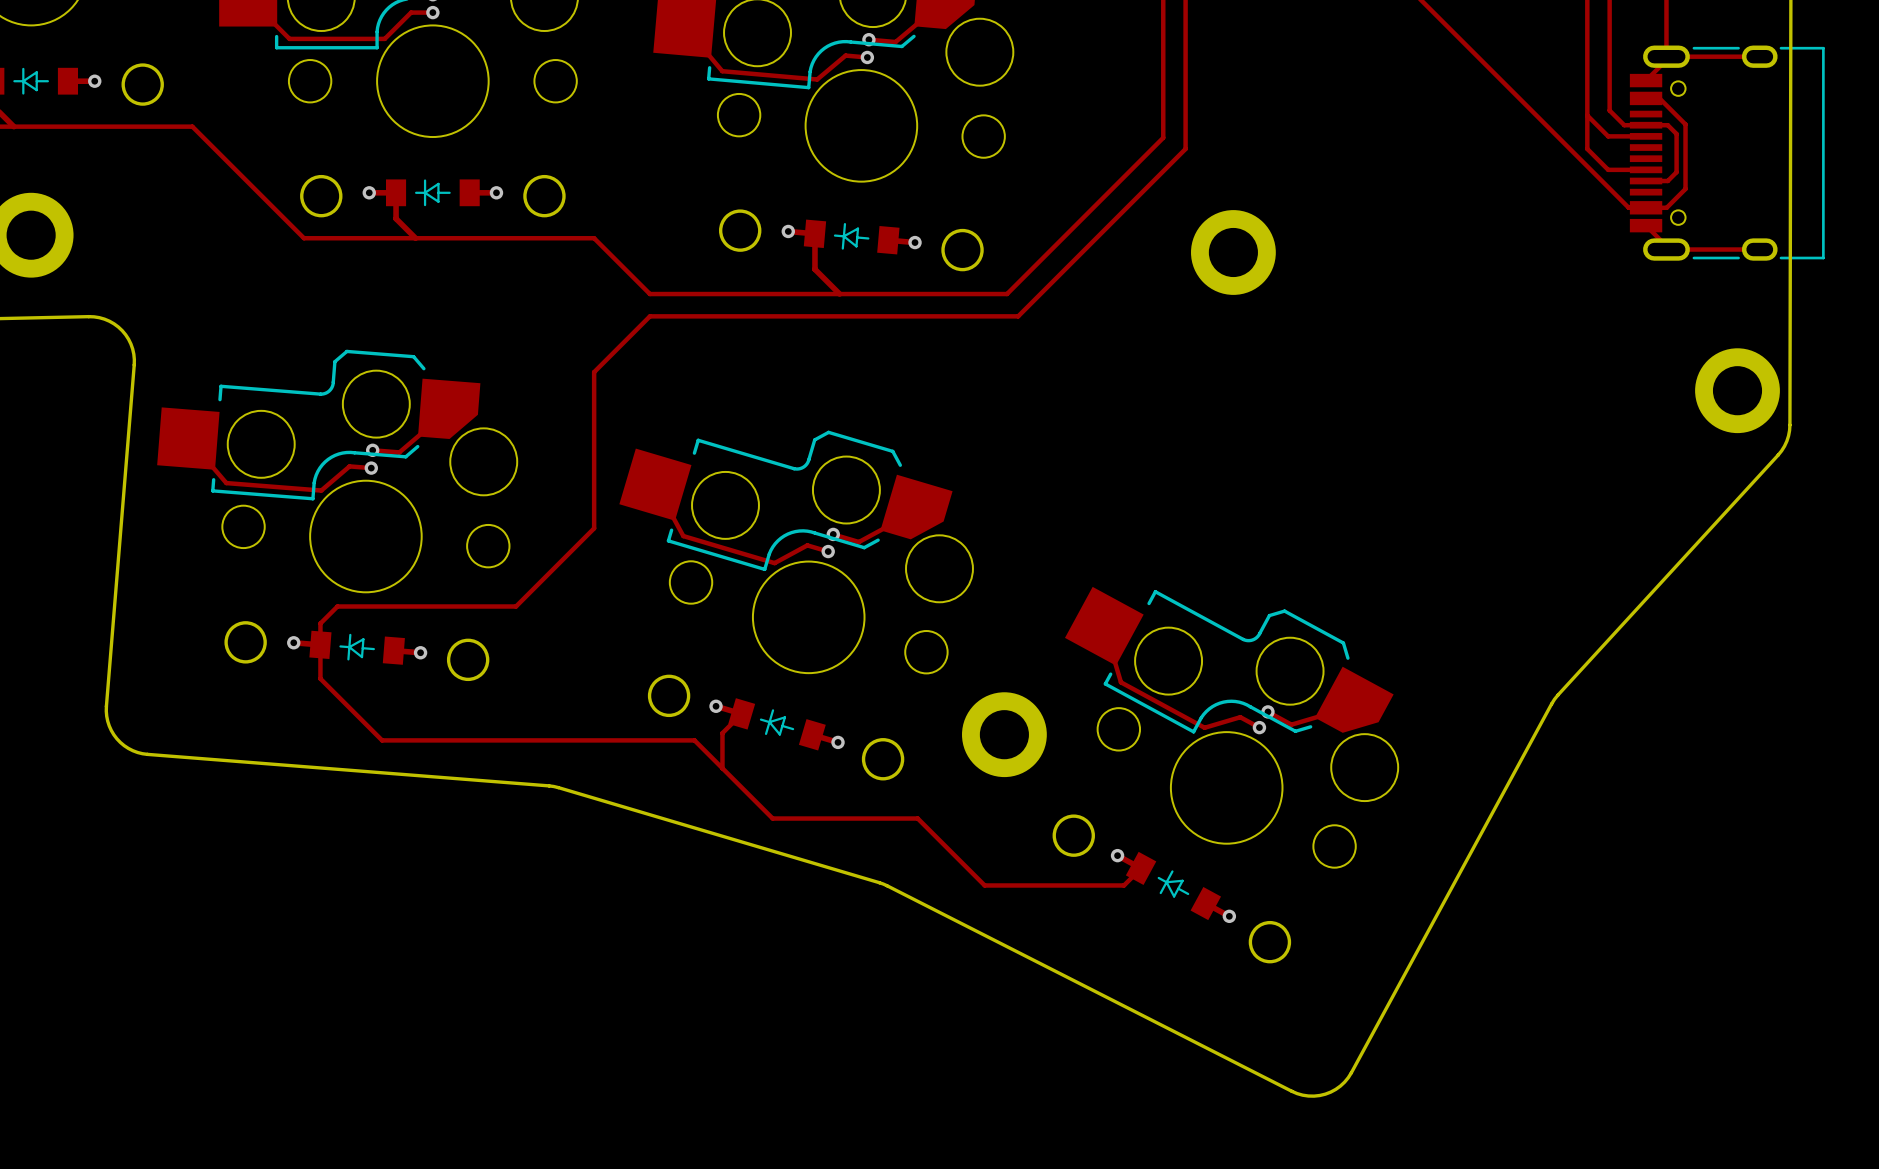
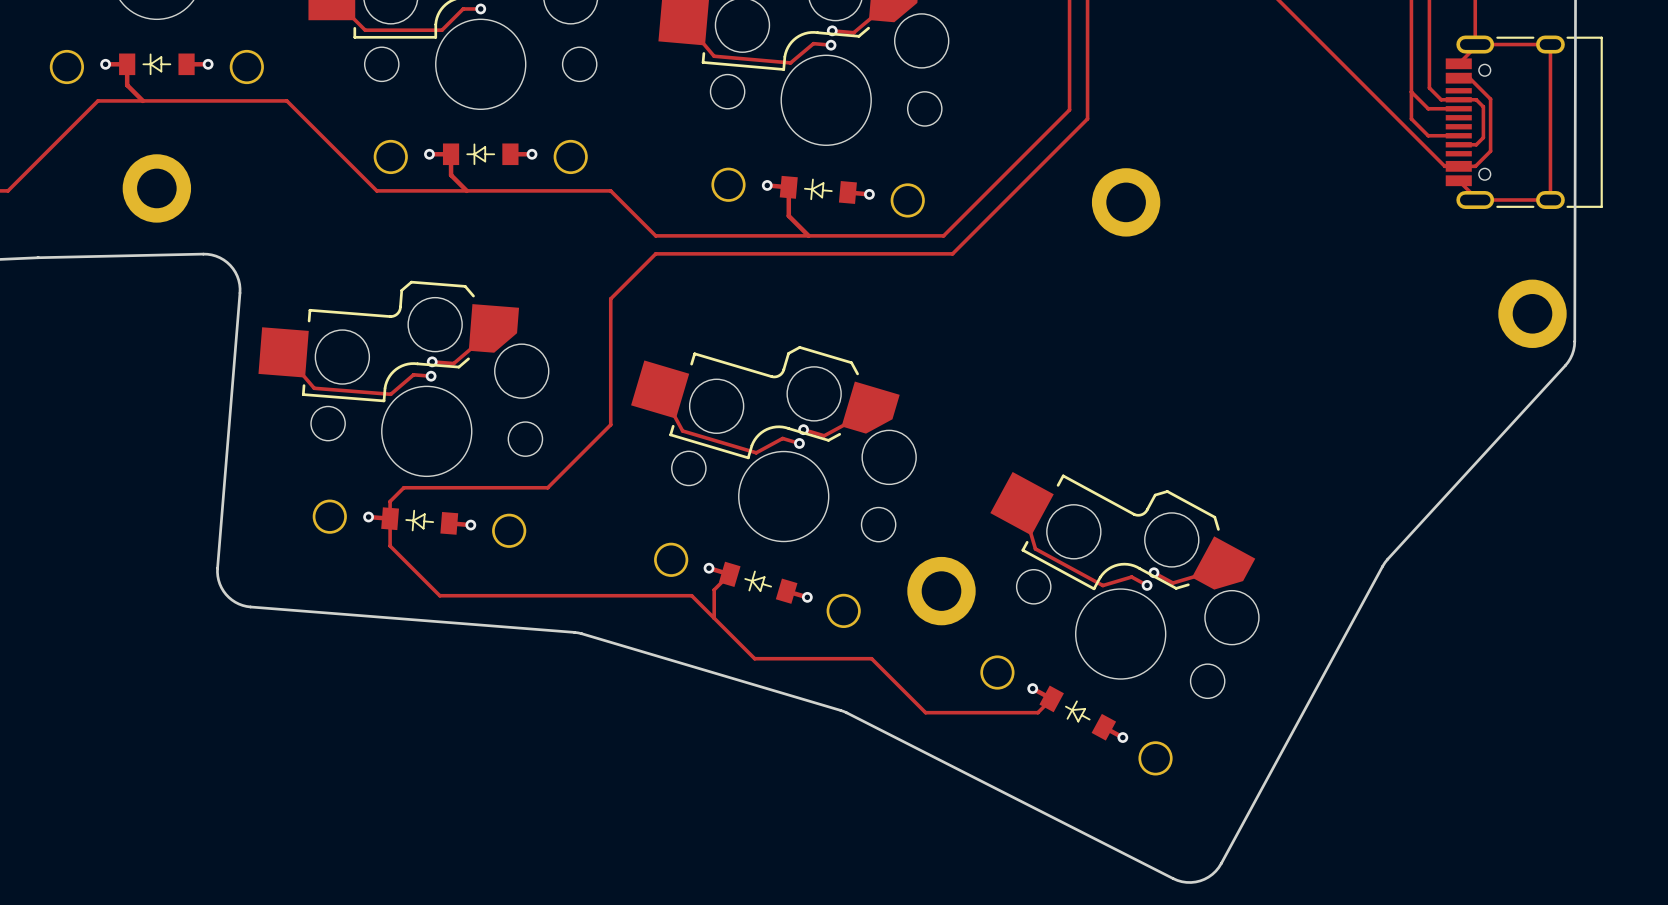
track: none -> (1550, 44) (1550, 199)

